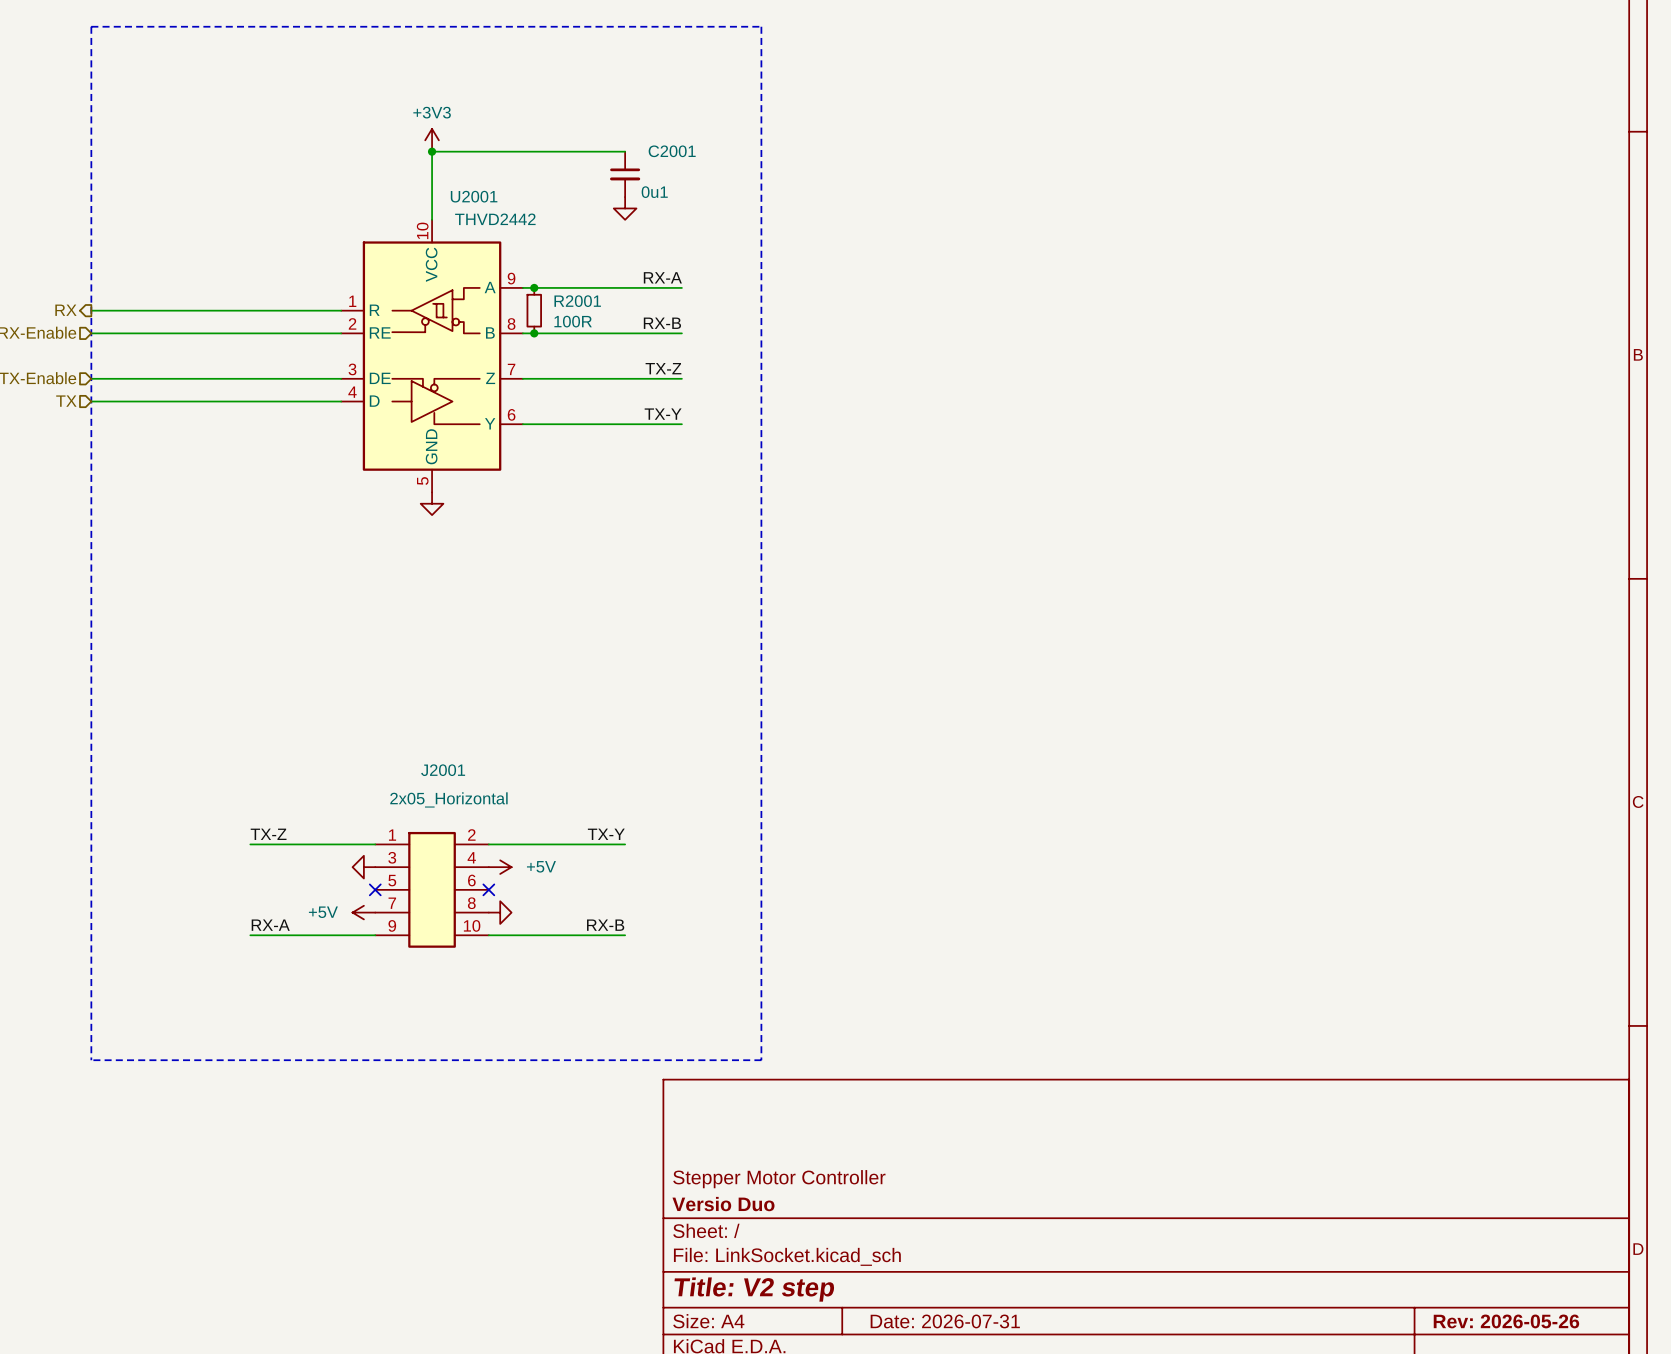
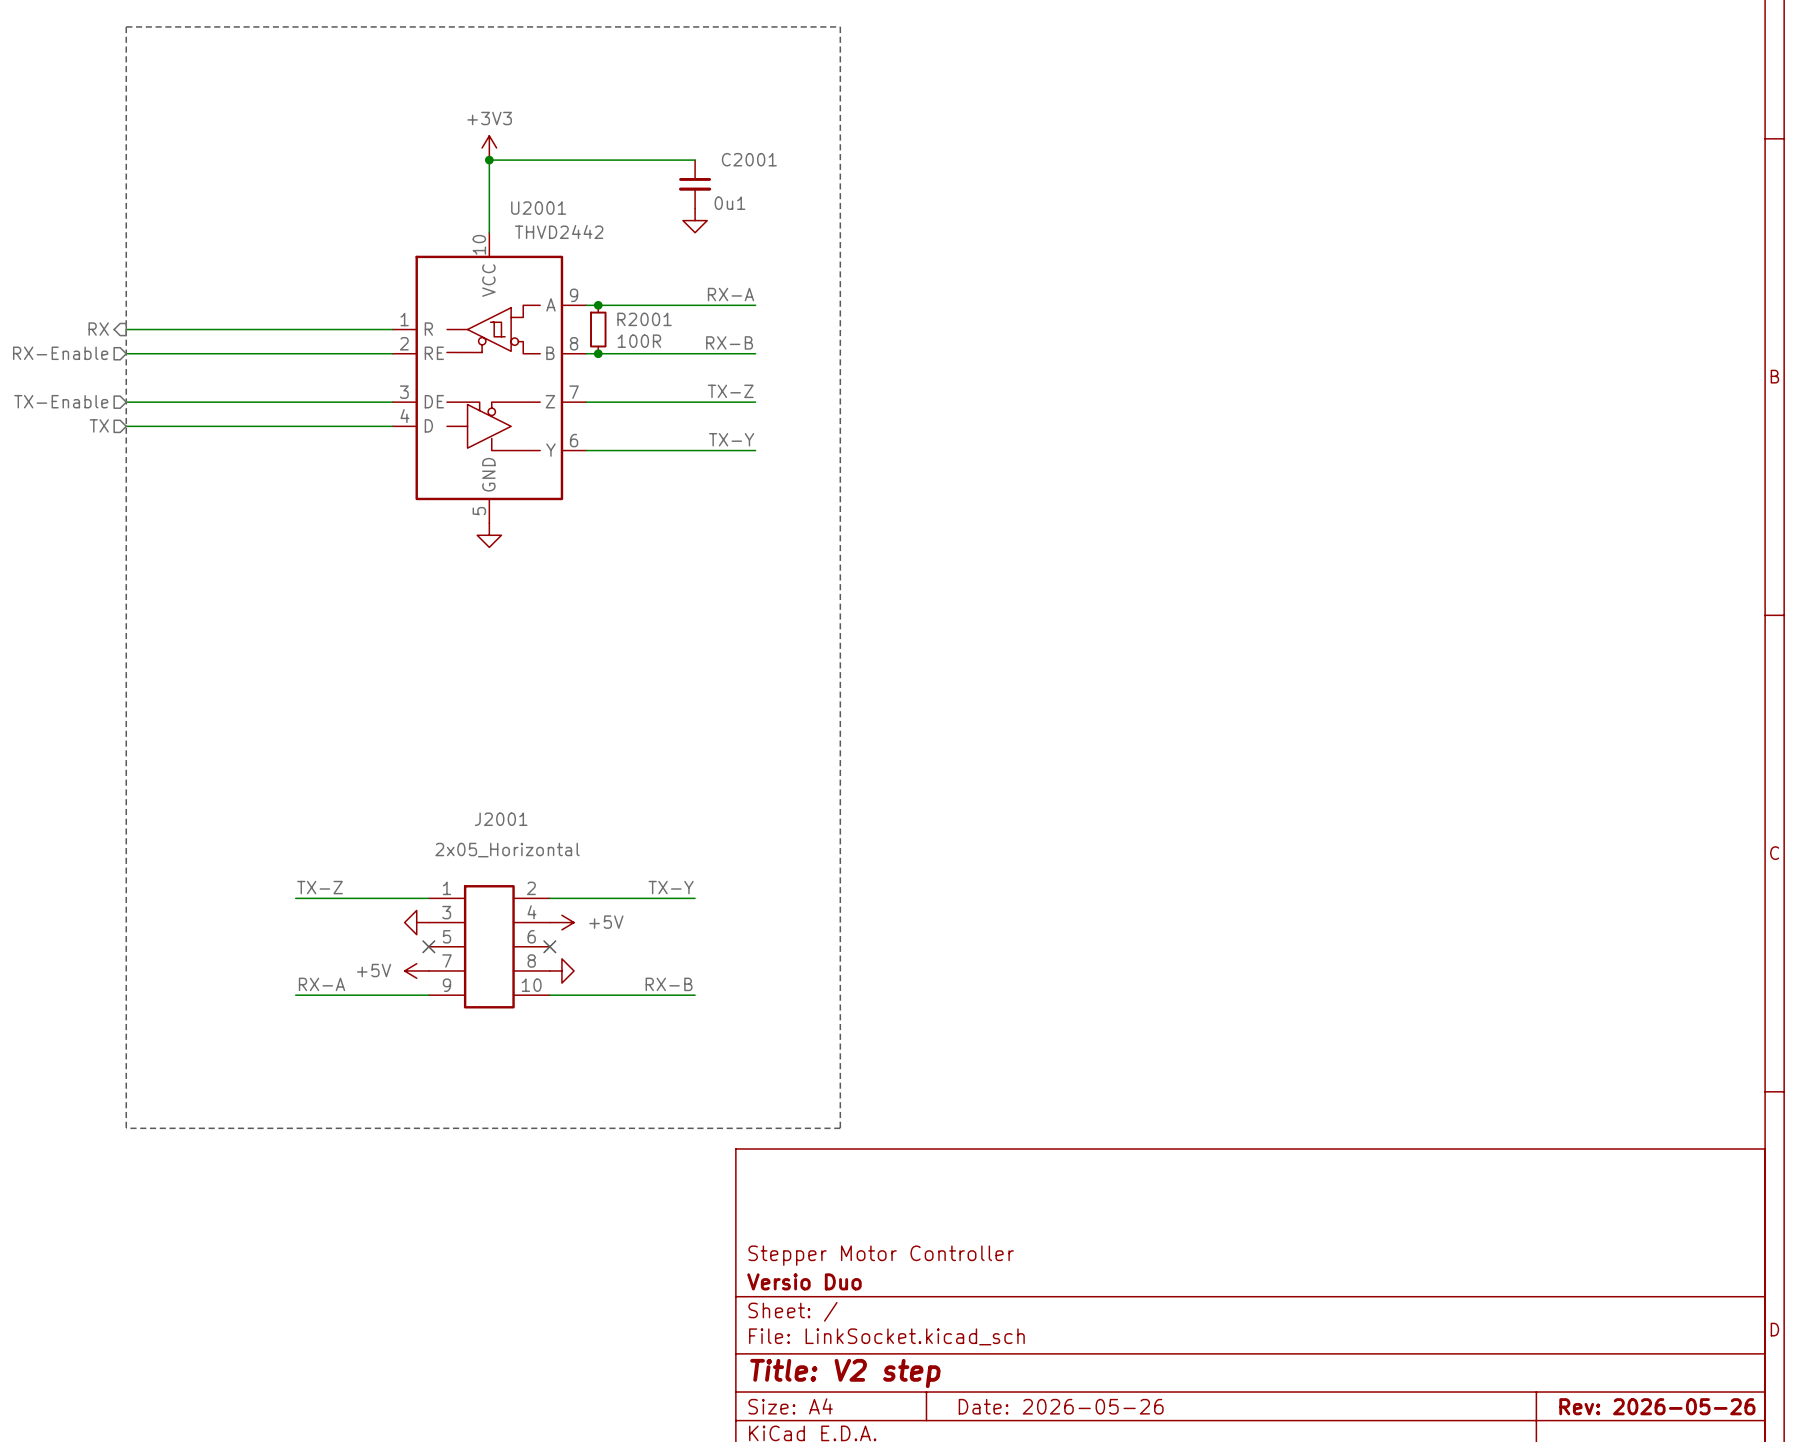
title block: Date: 2026-07-31 (945, 1321) -> Date: 2026-05-26 (1061, 1406)

